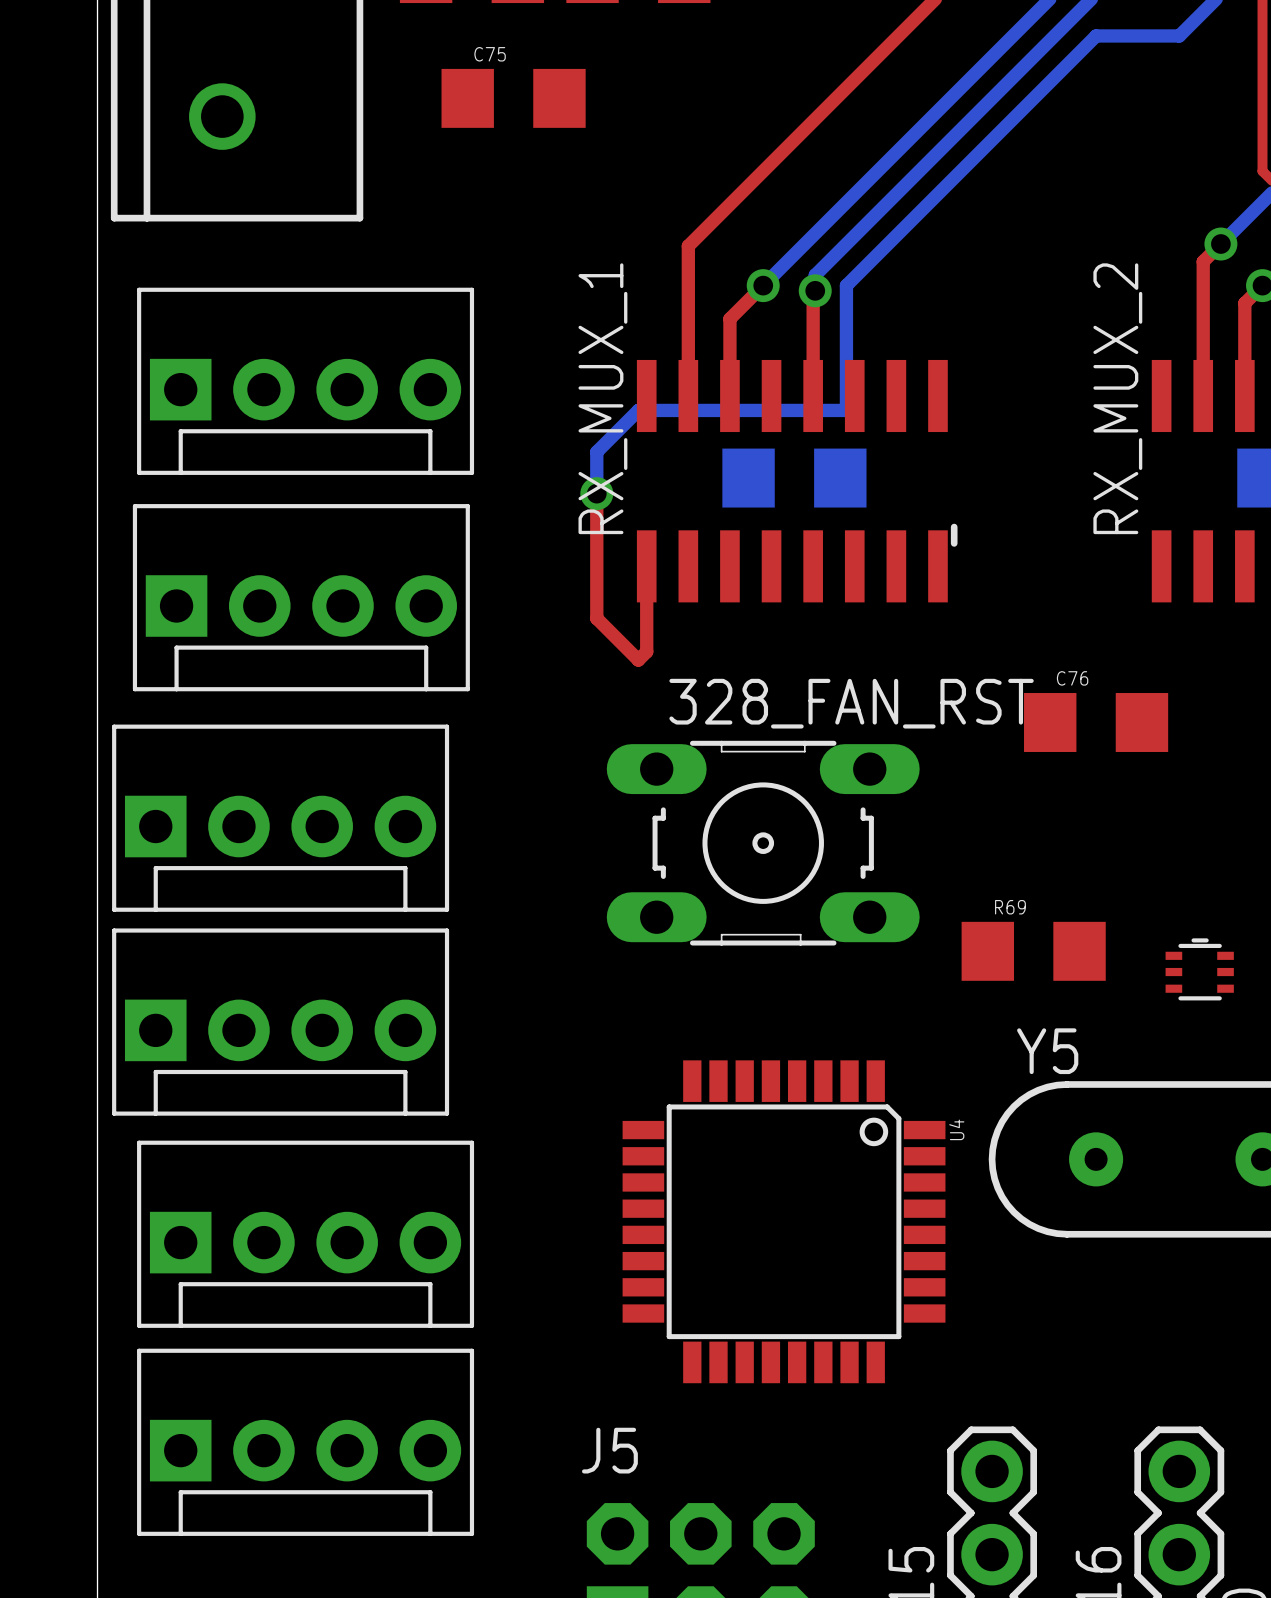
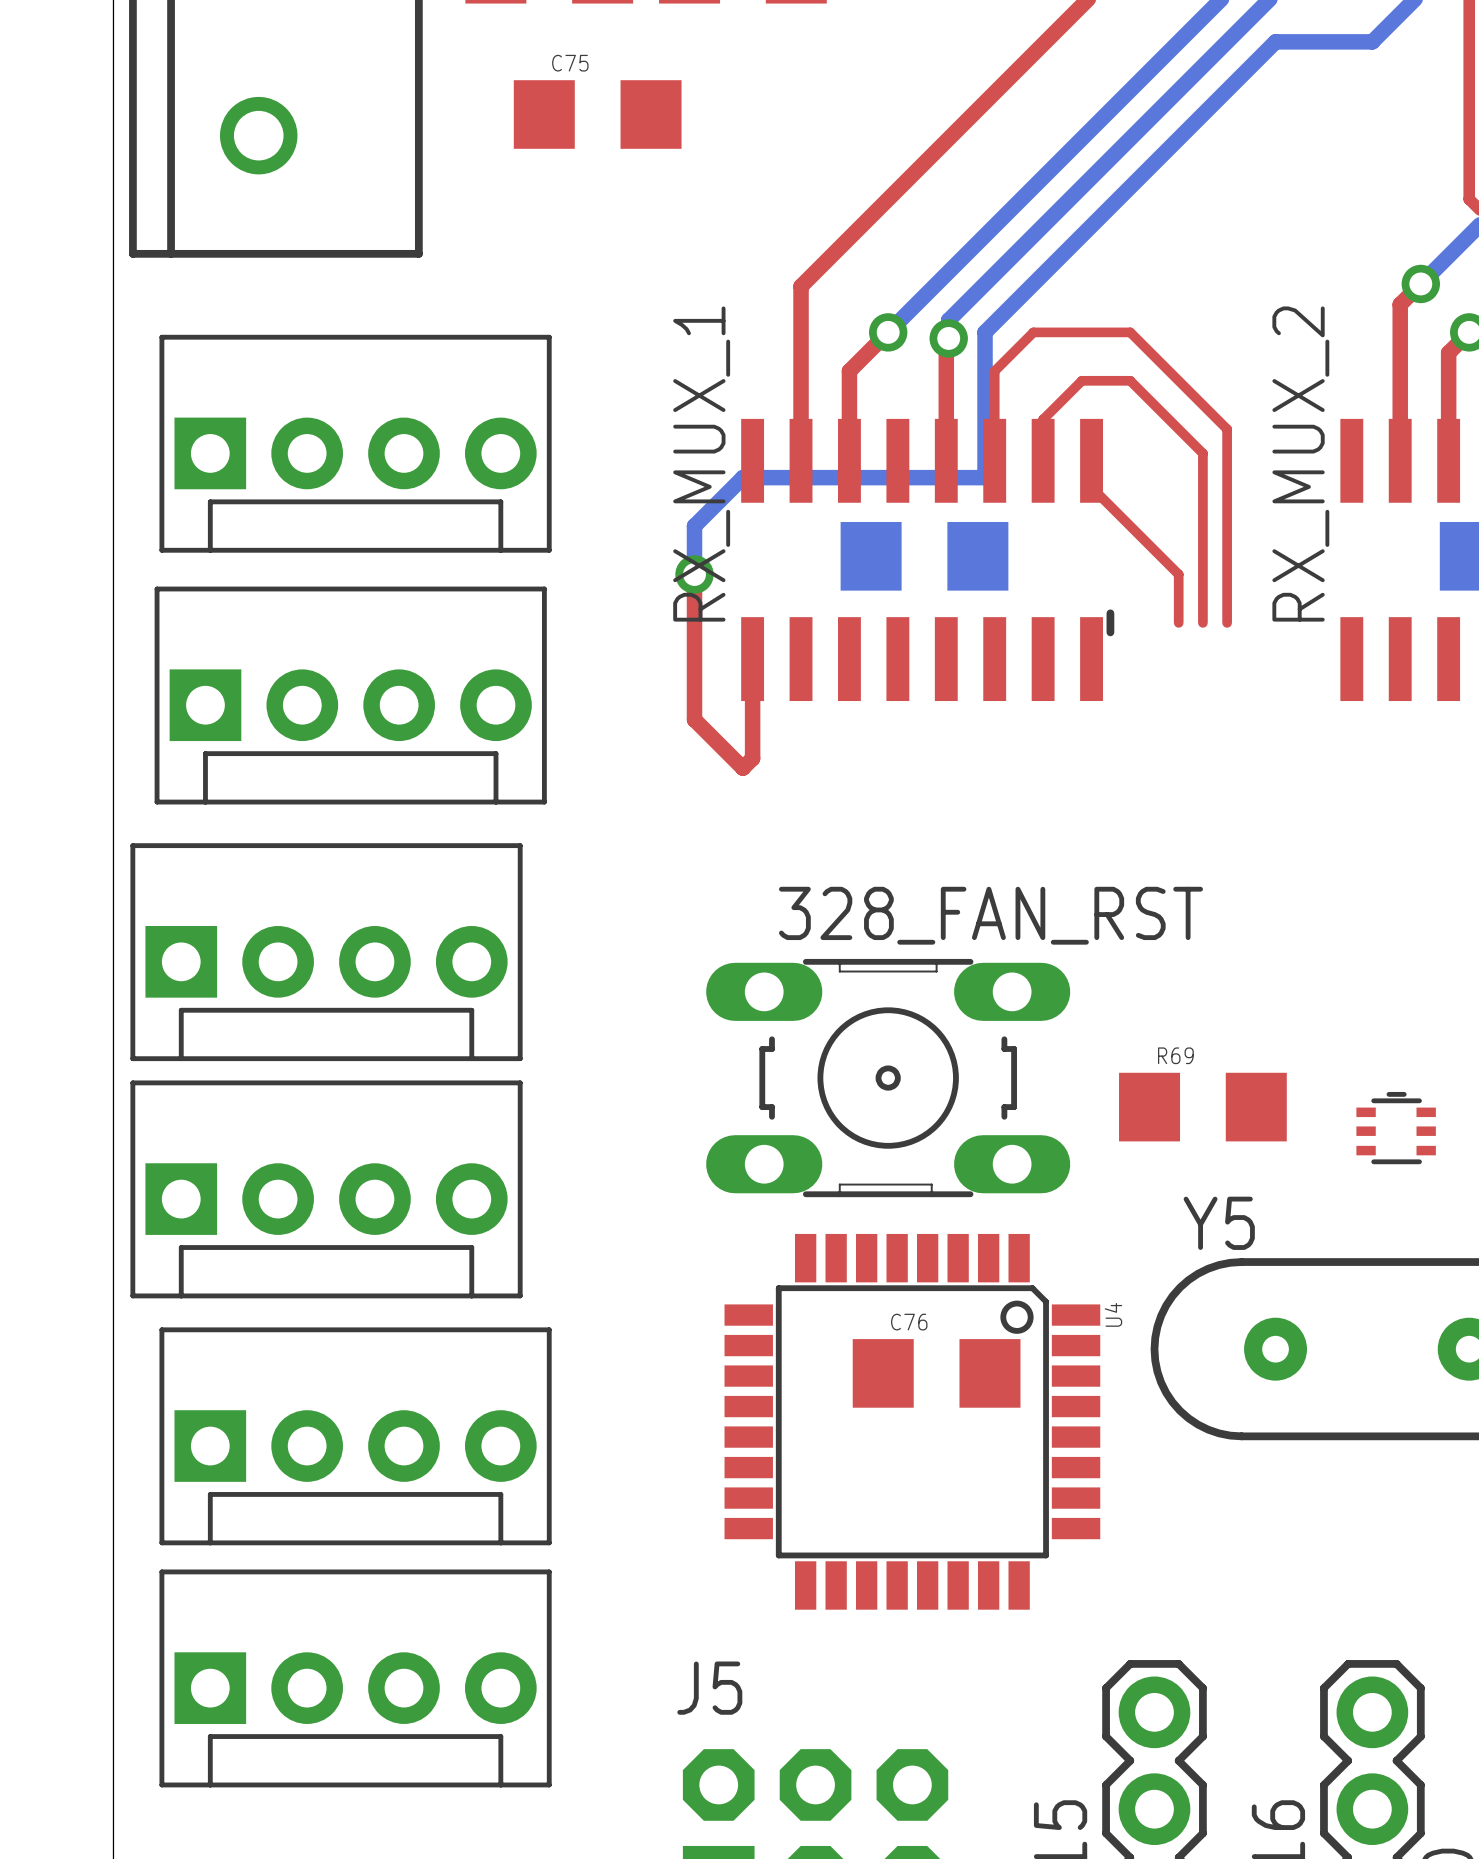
top track: none -> (994, 460) (994, 371) (1033, 332) (1130, 332) (1227, 429) (1227, 622)
top track: none -> (1043, 460) (1043, 419) (1081, 380) (1130, 380) (1202, 453) (1202, 622)
top track: none -> (1091, 460) (1091, 487) (1178, 574) (1178, 622)
C76 position: (1096, 722) -> (936, 1373)
328_FAN_RST position: (763, 843) -> (888, 1078)

